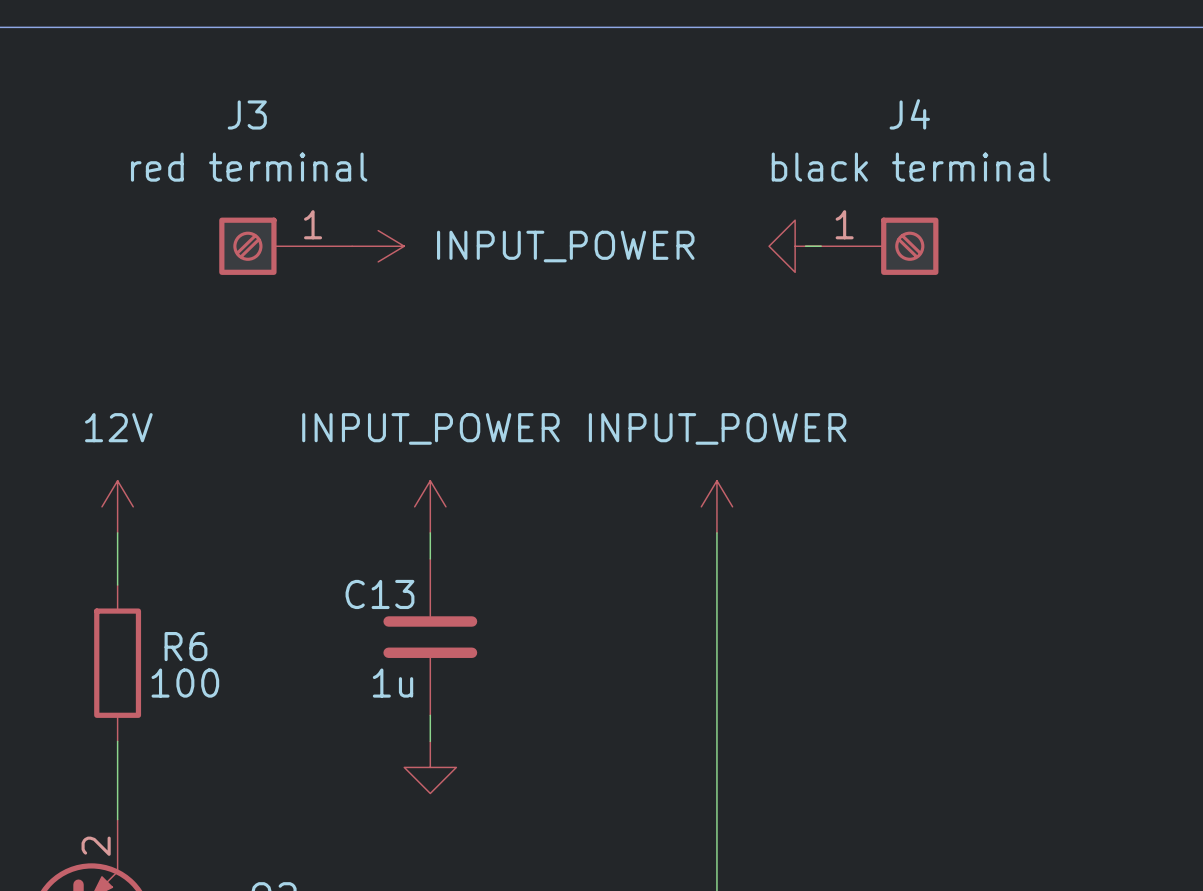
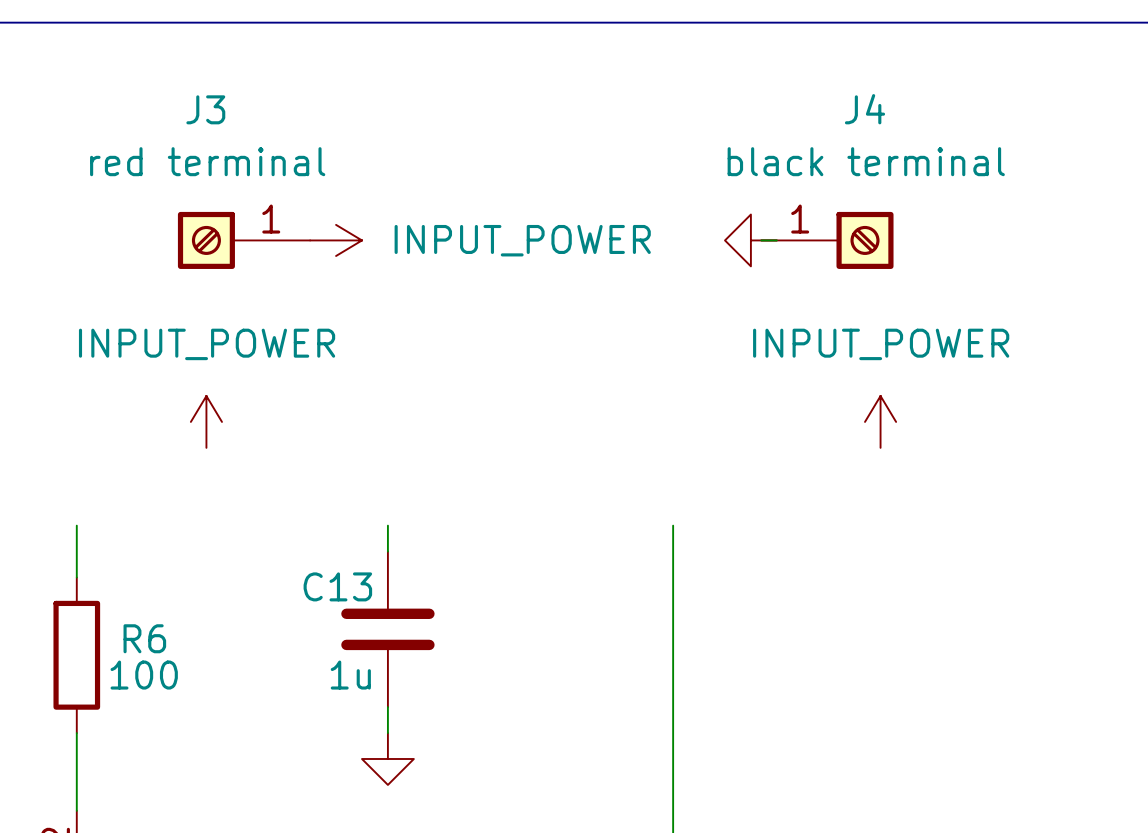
power symbol: 12V (117, 506) -> none
power symbol position: INPUT_POWER (430, 506) -> INPUT_POWER (206, 421)
power symbol position: INPUT_POWER (716, 506) -> INPUT_POWER (880, 421)

